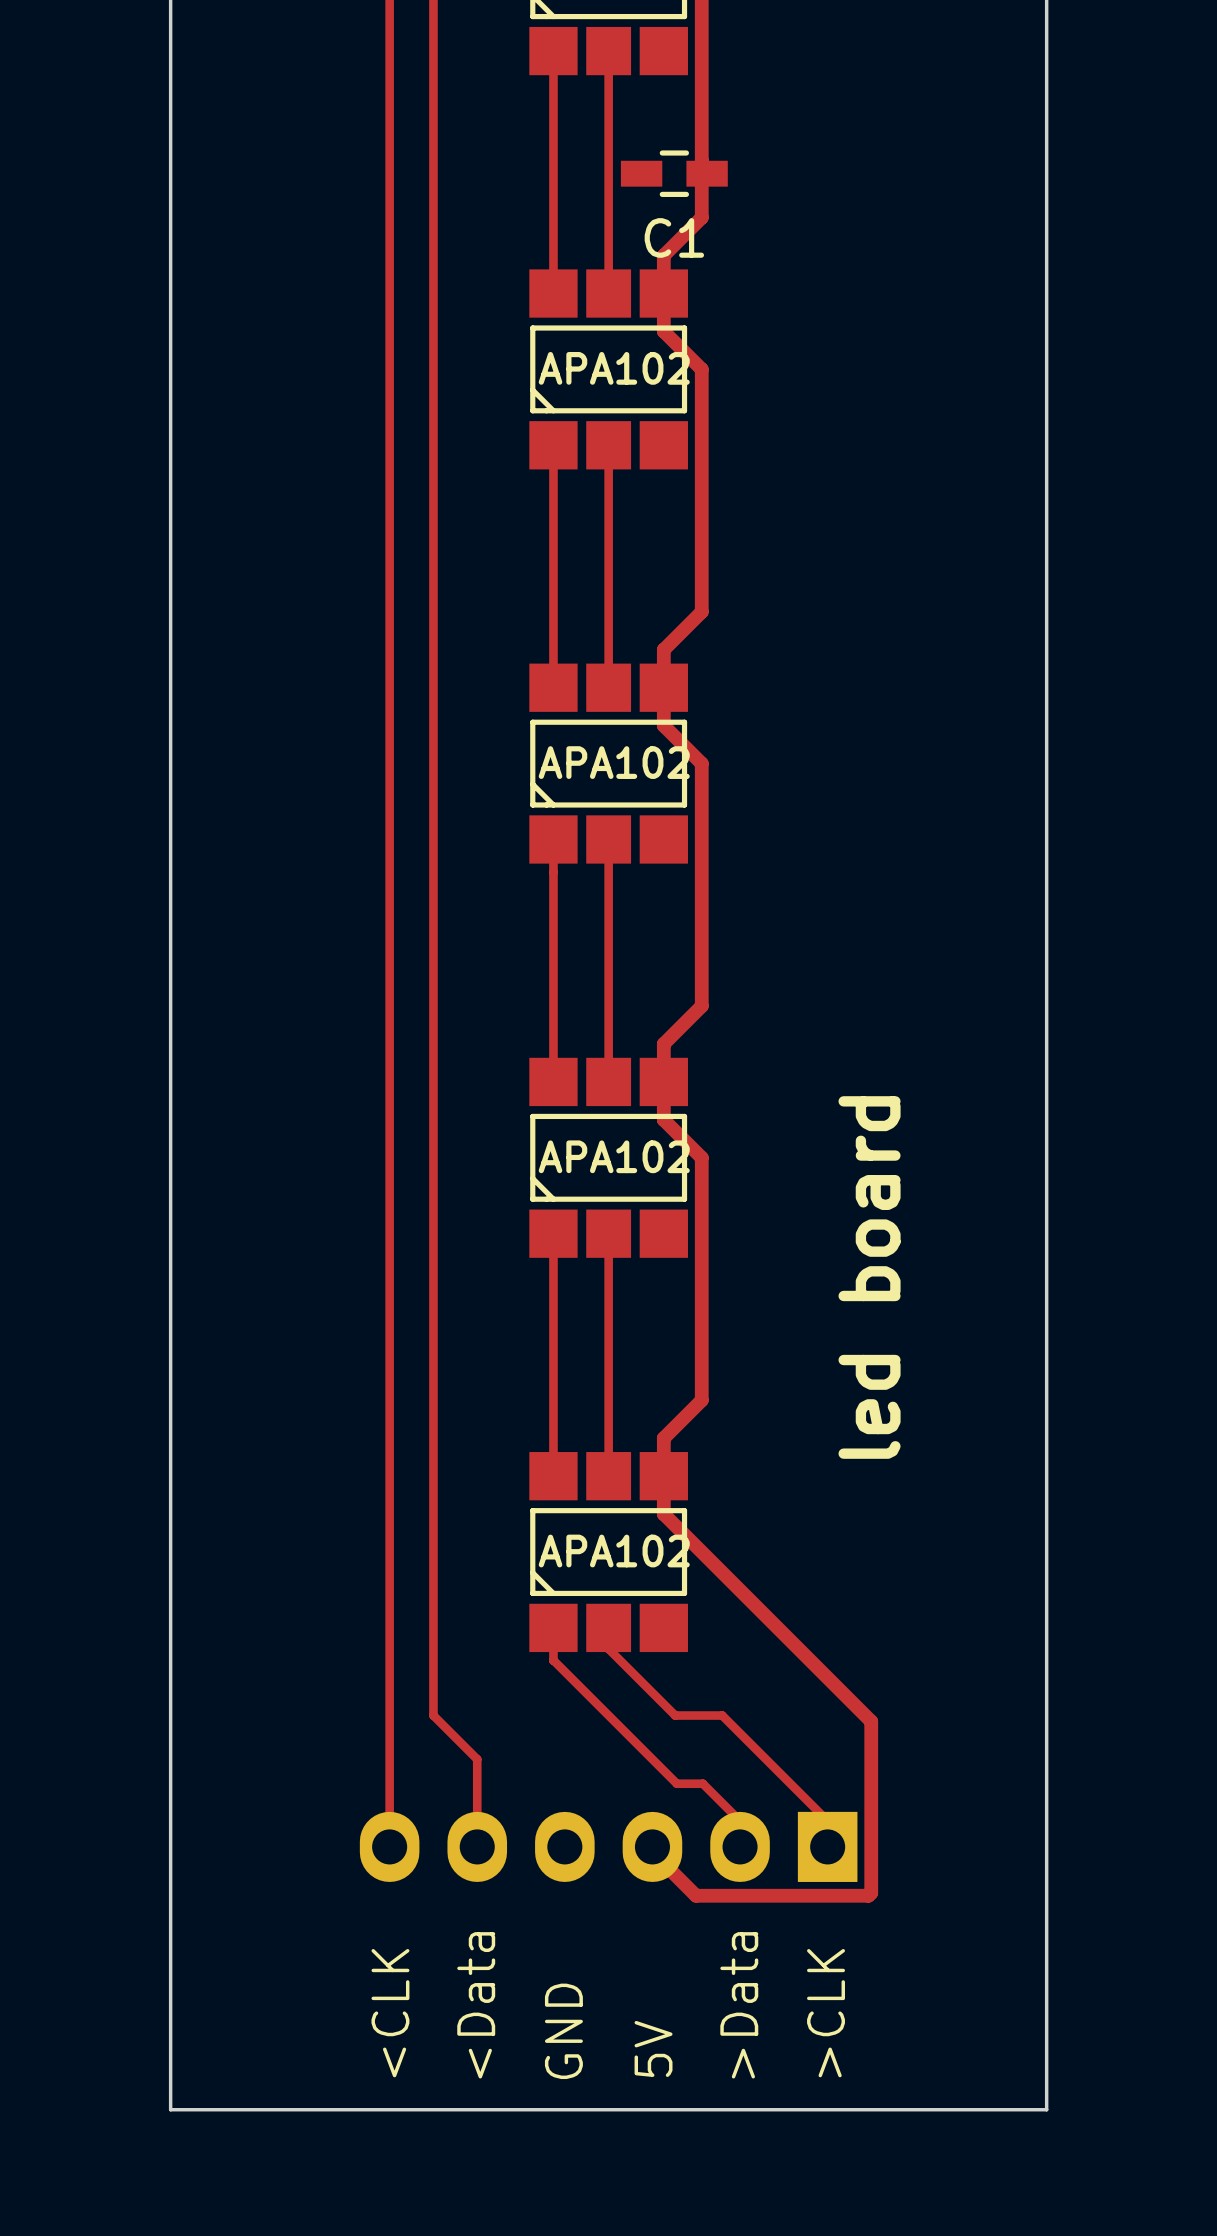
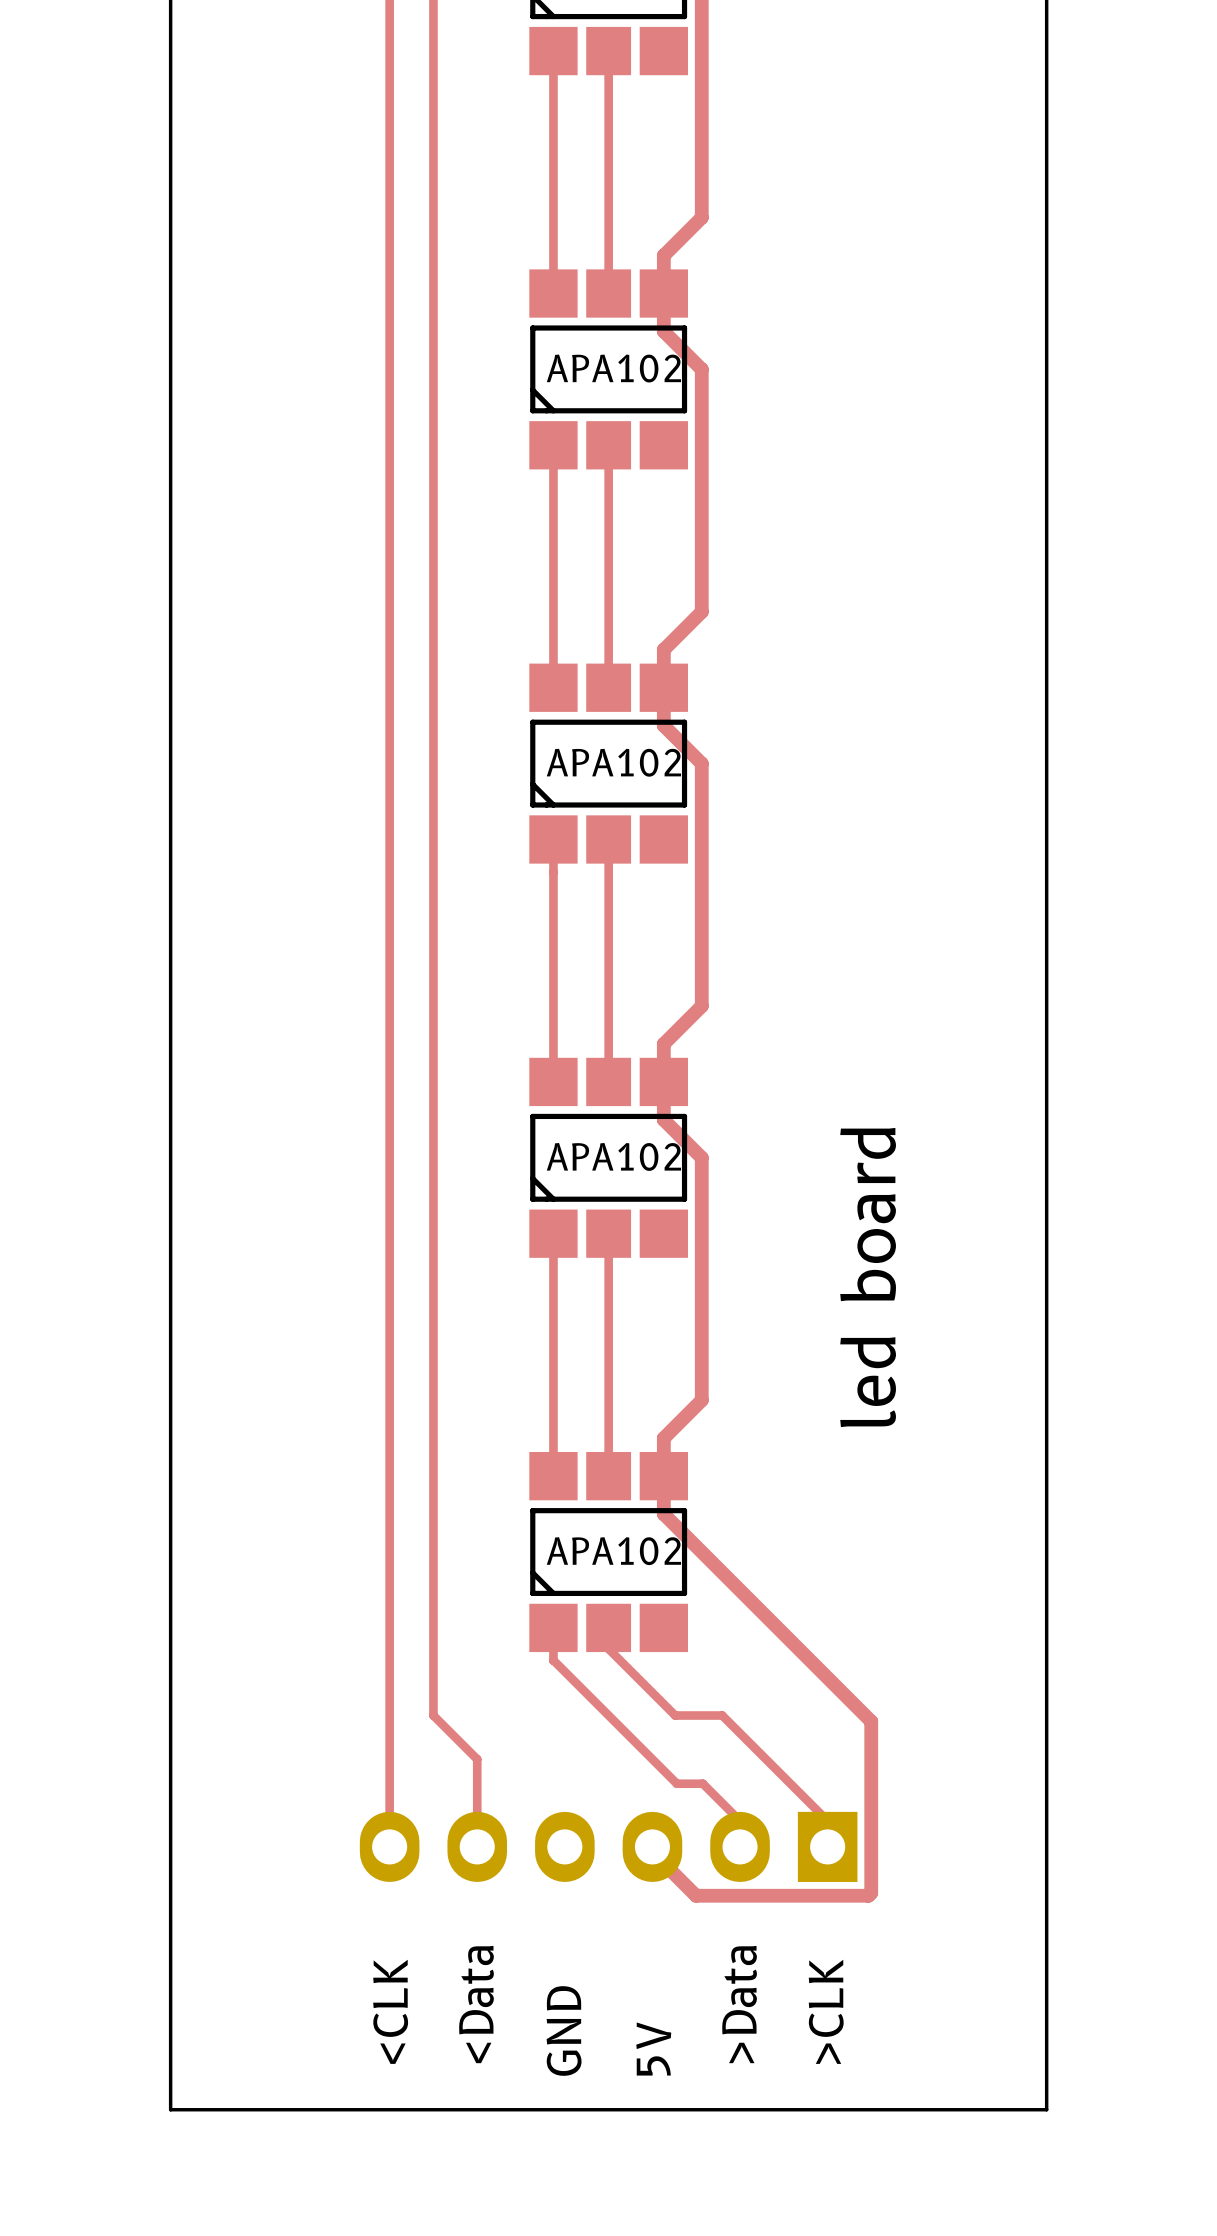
C1: (674, 173) -> none

